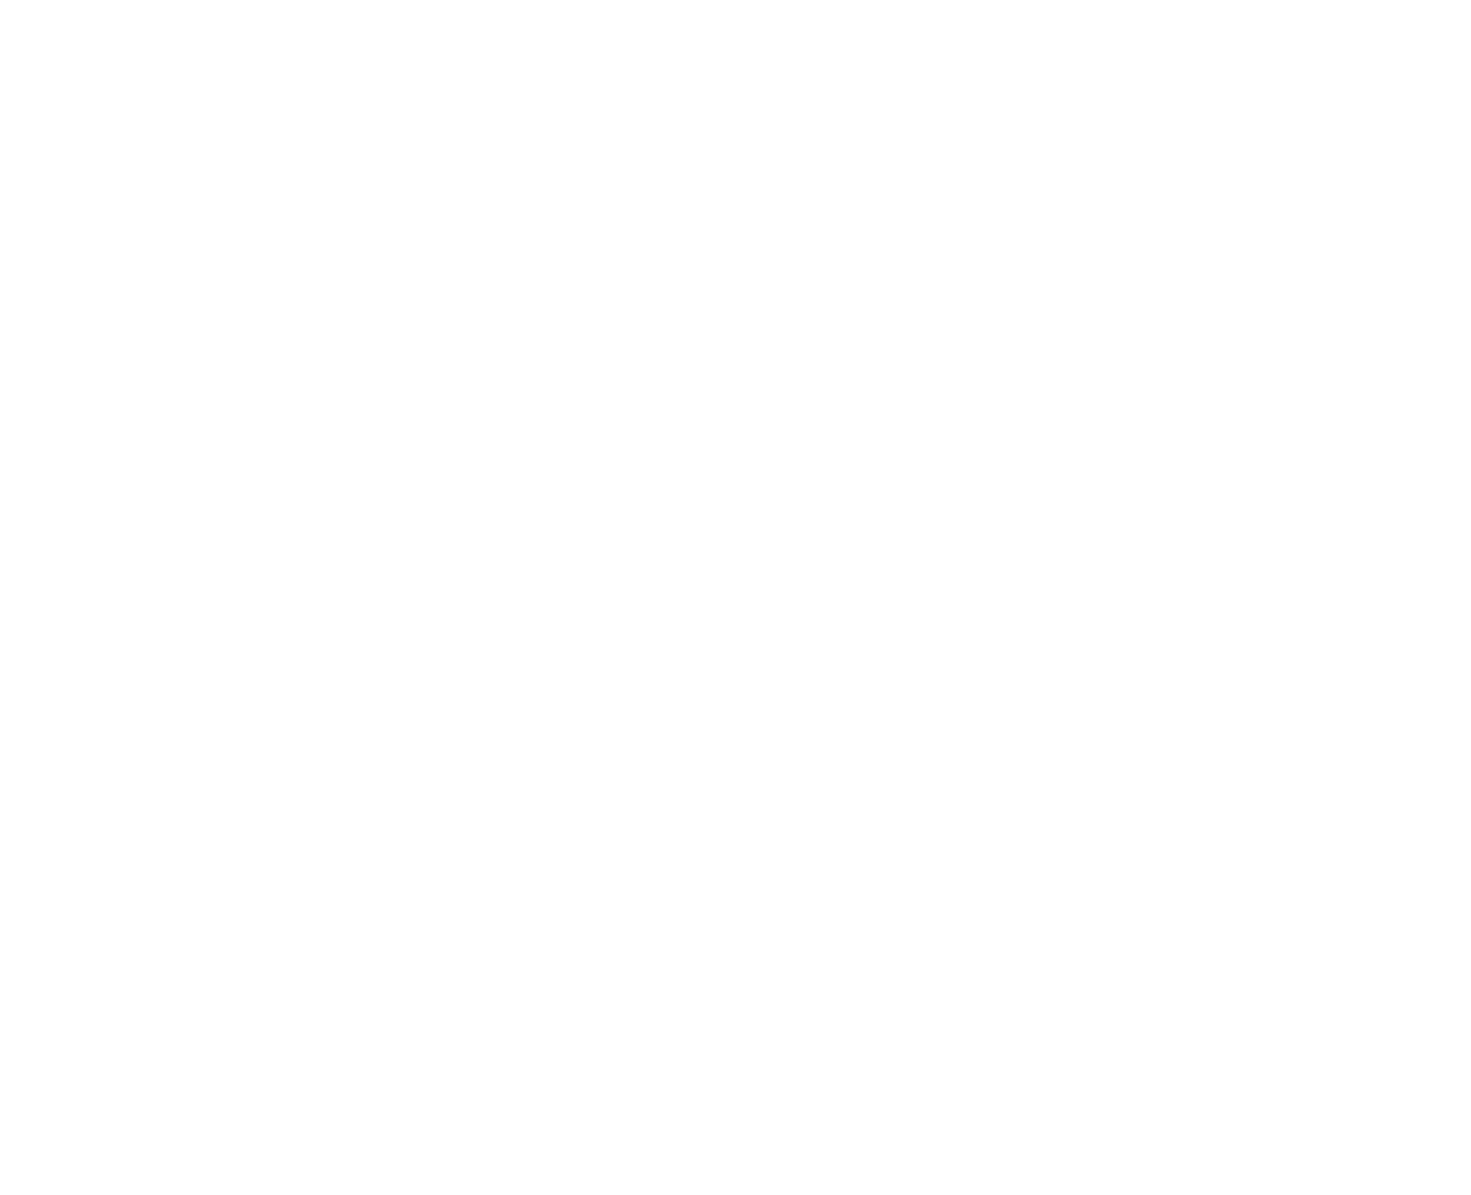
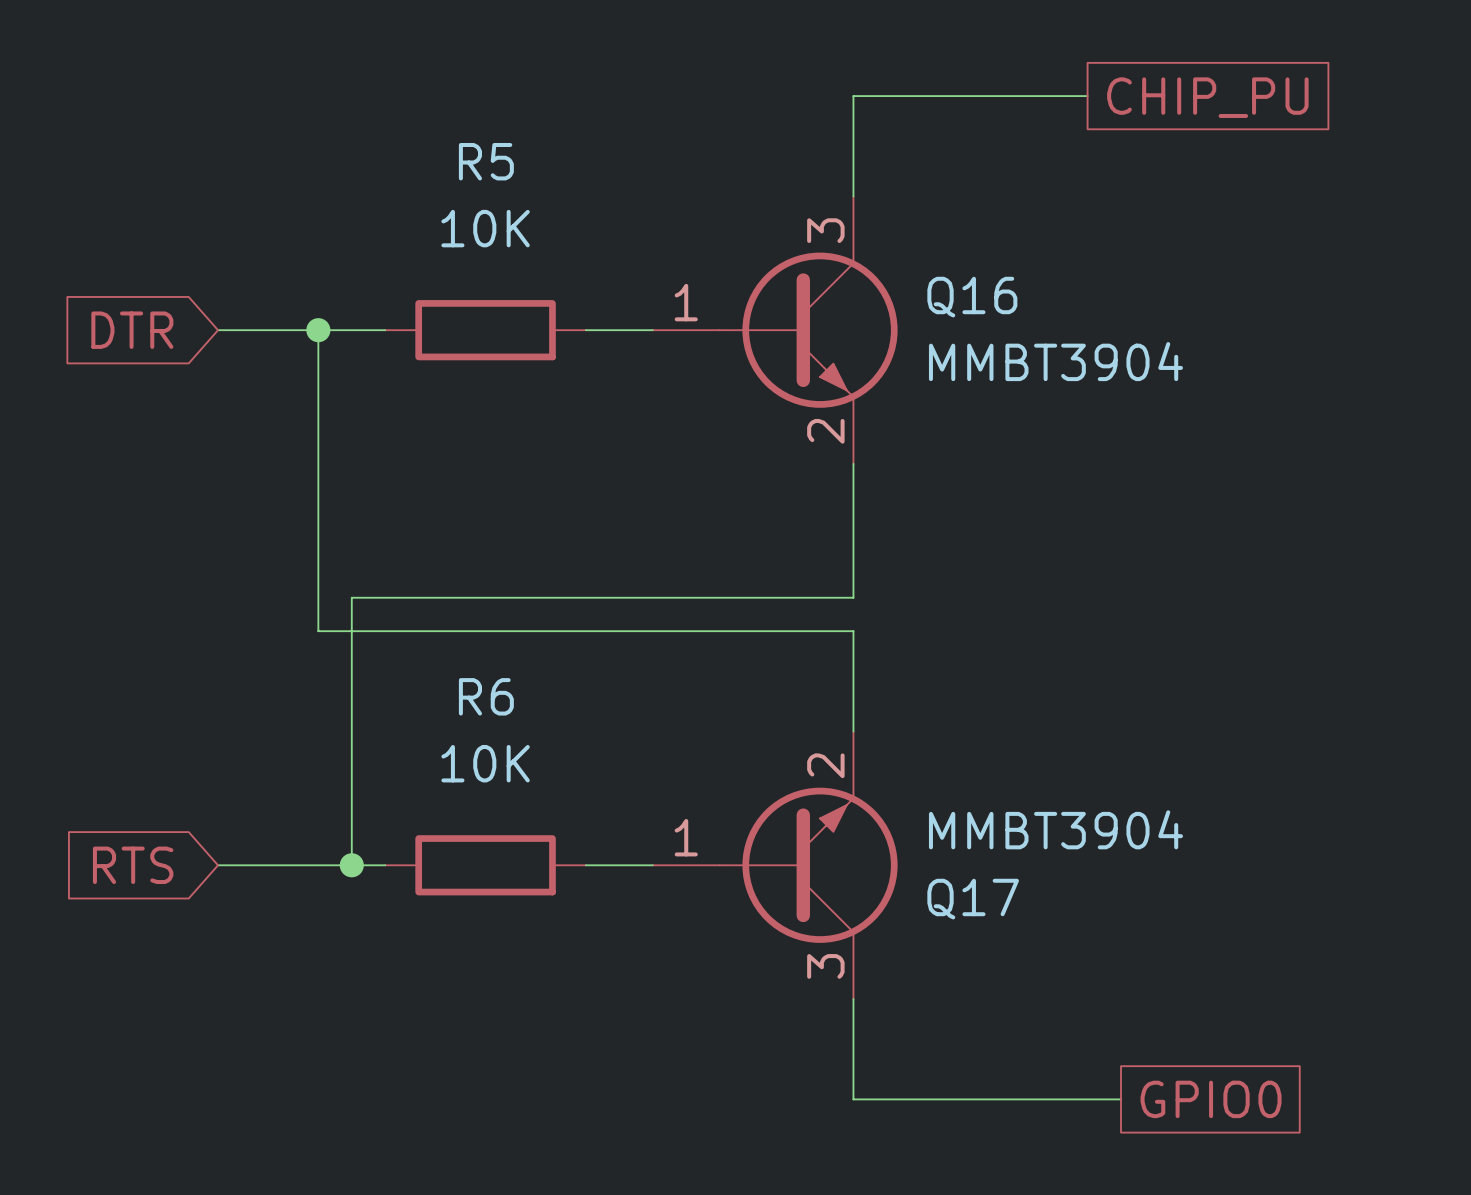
wire: none -> (1087, 96) (853, 96) (853, 196)
global label: none -> CHIP_PU (1207, 97)
global label: none -> DTR (132, 330)
wire: none -> (218, 330) (385, 330)
wire: none -> (318, 330) (318, 631) (853, 631) (853, 731)
junction: none -> (318, 330)
R5: none -> 10K (485, 330)
wire: none -> (585, 330) (652, 330)
Q16: none -> MMBT3904 (775, 330)
wire: none -> (853, 463) (853, 597) (351, 597) (351, 865)
global label: none -> RTS (133, 865)
wire: none -> (218, 865) (385, 865)
junction: none -> (351, 865)
R6: none -> 10K (485, 865)
wire: none -> (585, 865) (652, 865)
Q17: none -> MMBT3904 (775, 865)
wire: none -> (853, 999) (853, 1099) (1121, 1099)
global label: none -> GPIO0 (1211, 1099)

